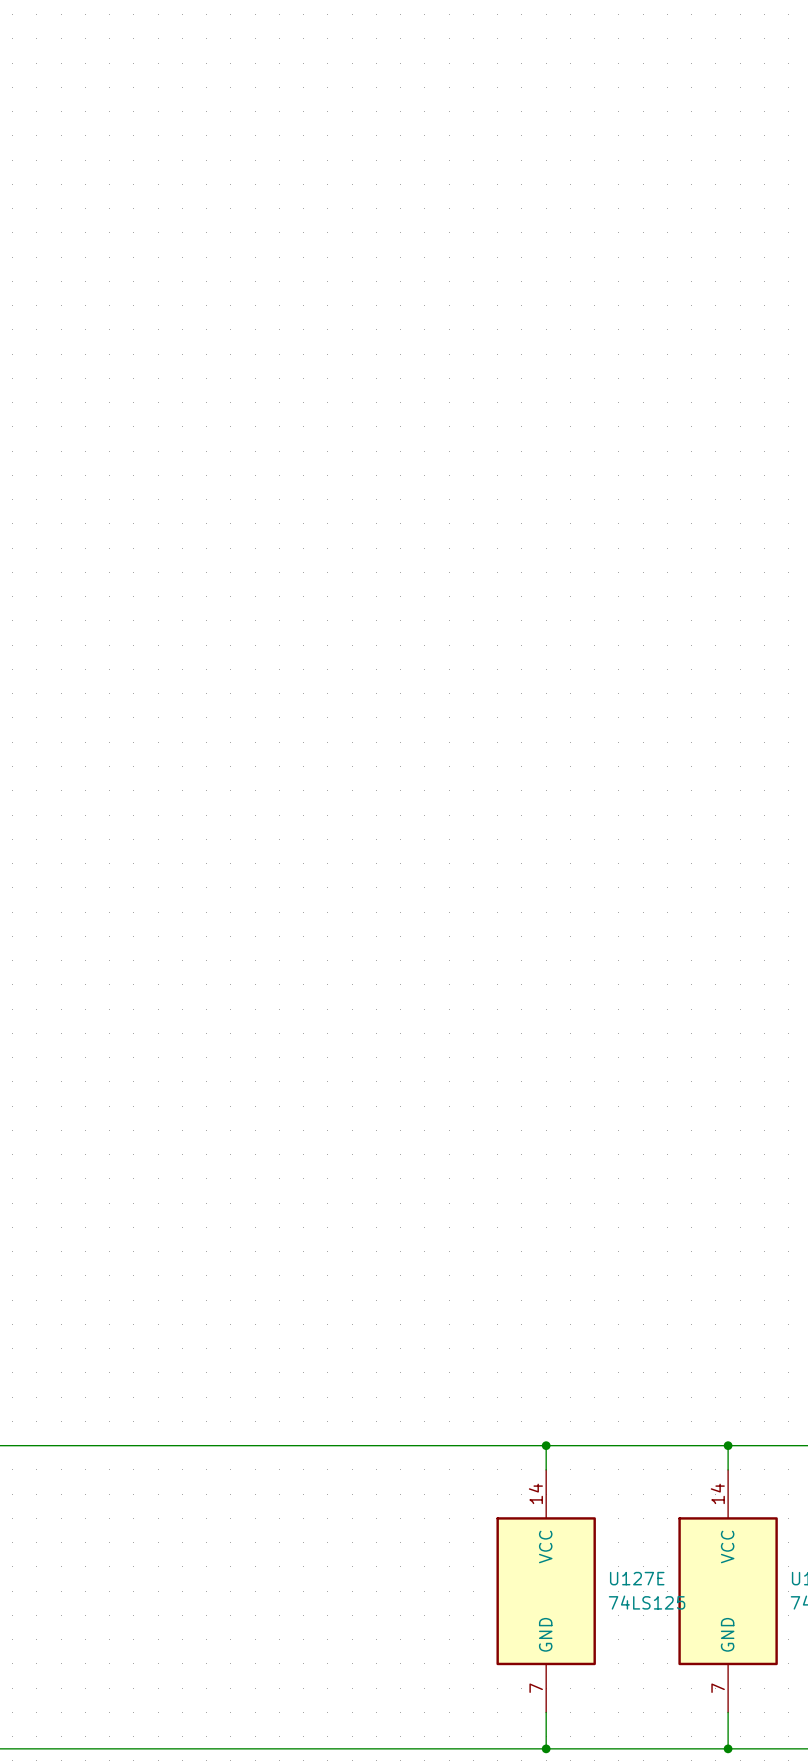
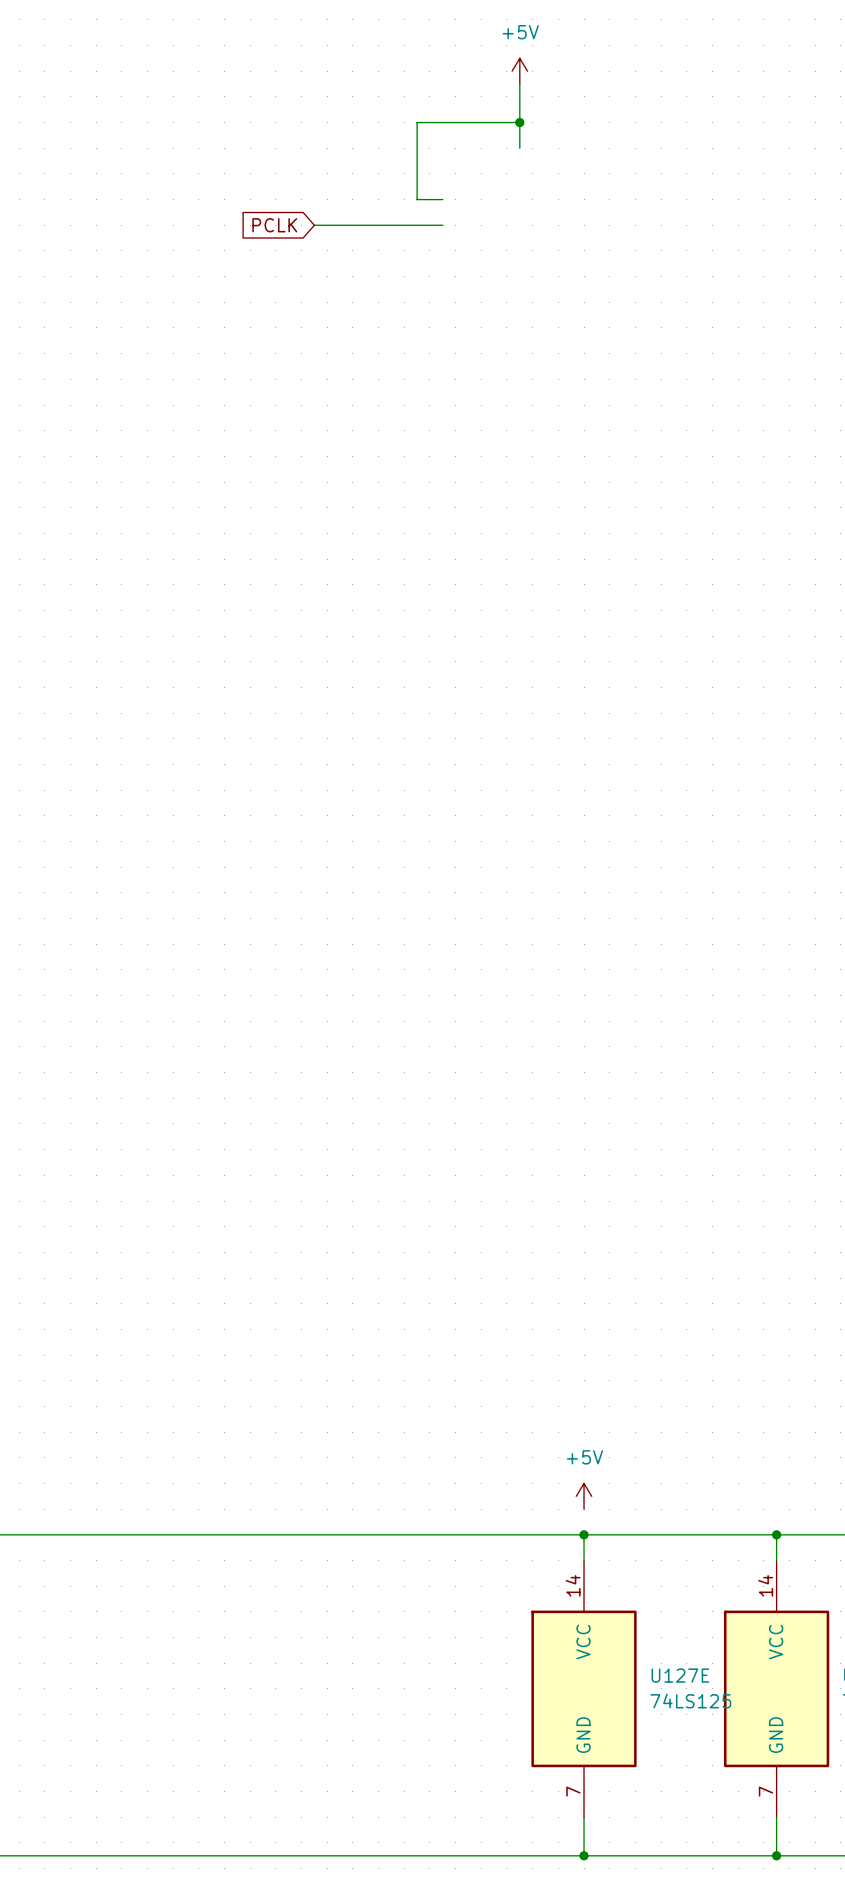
power symbol: none -> +5V (519, 71)
wire: none -> (519, 84) (519, 148)
wire: none -> (519, 122) (417, 122) (417, 199) (442, 199)
junction: none -> (519, 122)
global label: none -> PCLK (274, 225)
wire: none -> (314, 225) (442, 225)
power symbol: none -> +5V (584, 1496)

